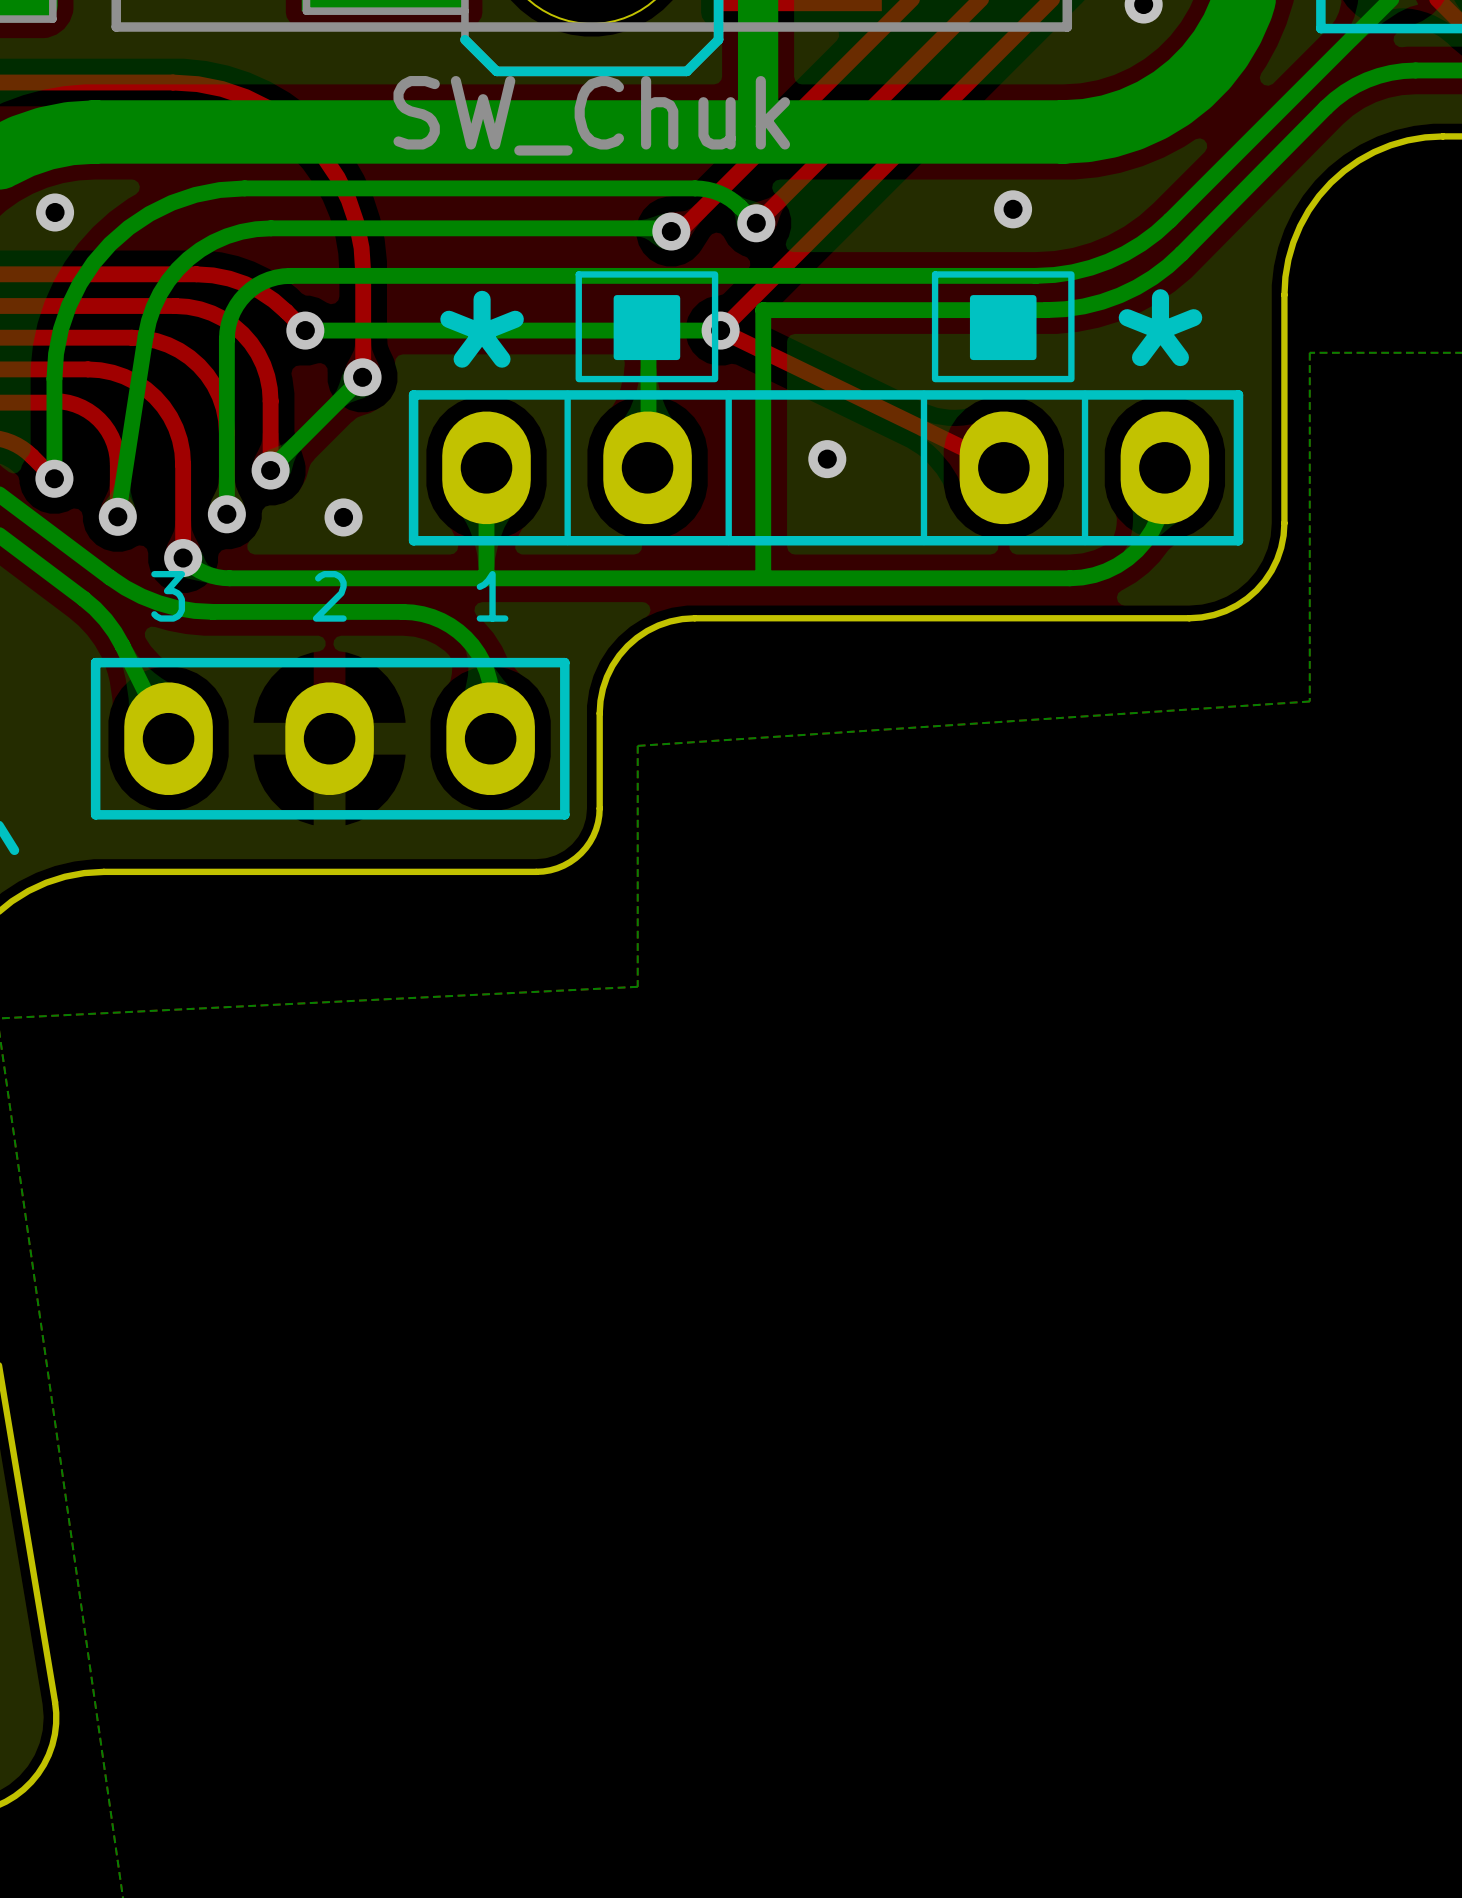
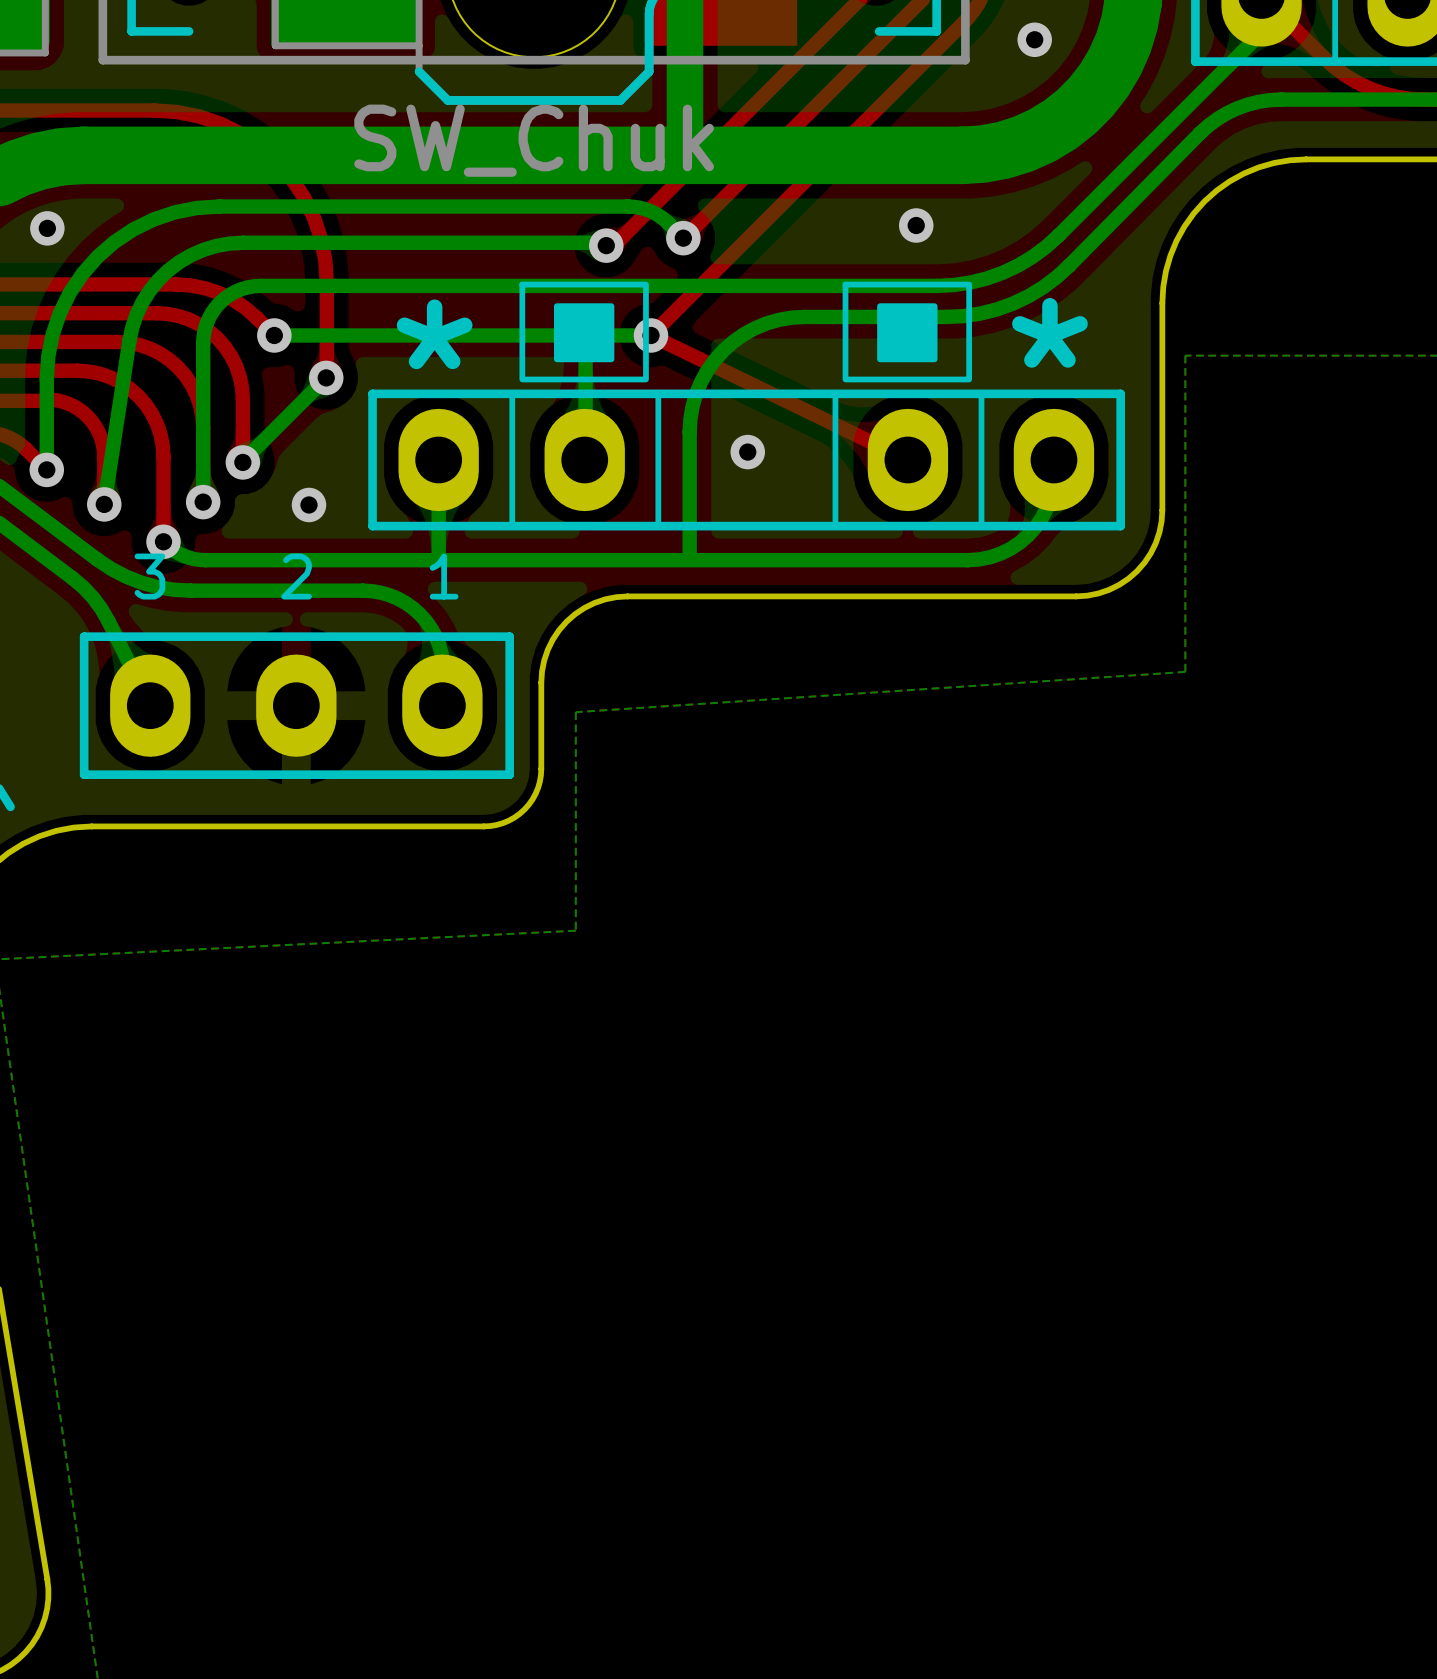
bottom track: (890, 310) (763, 310) (763, 436) -> (804, 316) (766, 323) (743, 334) (723, 350) (707, 370) (696, 393) (689, 431)

